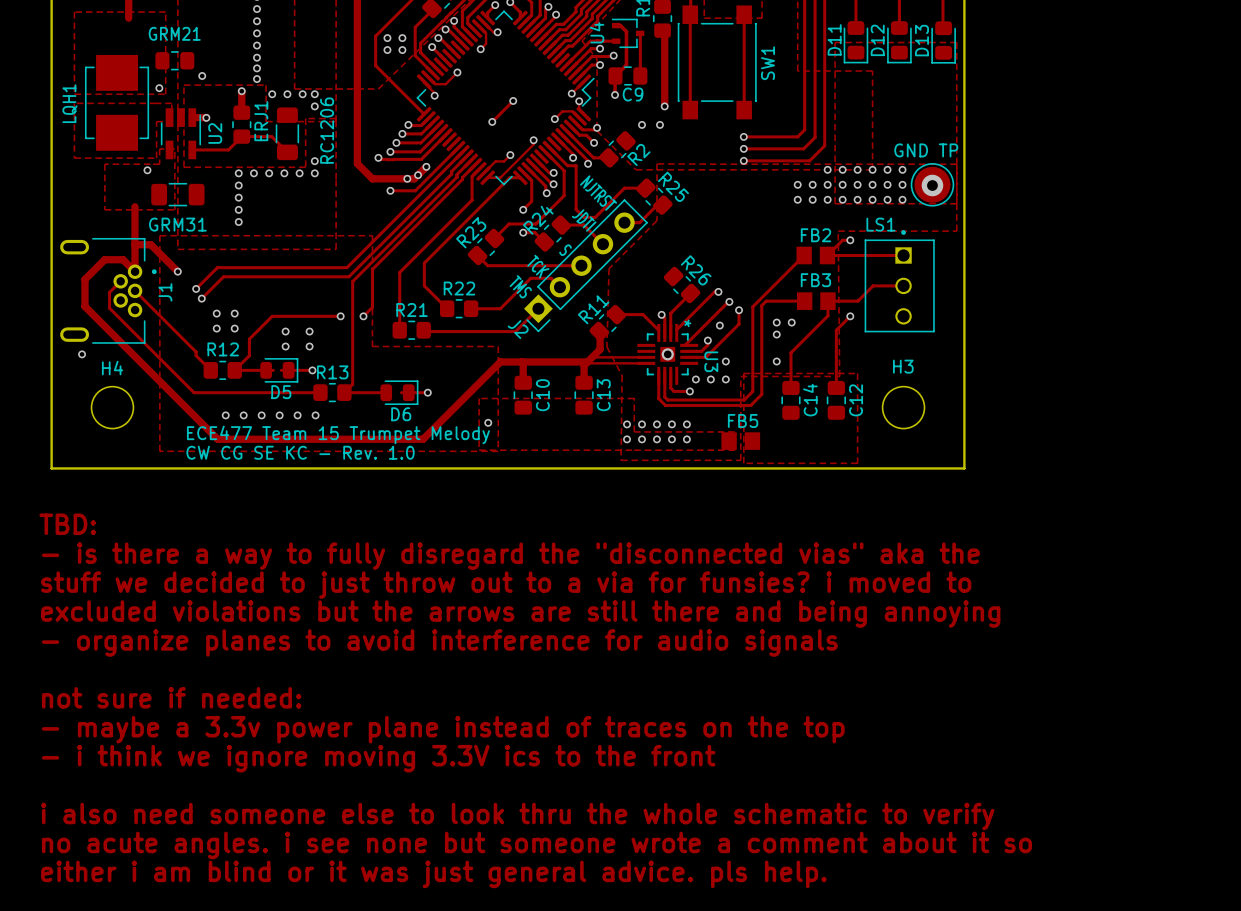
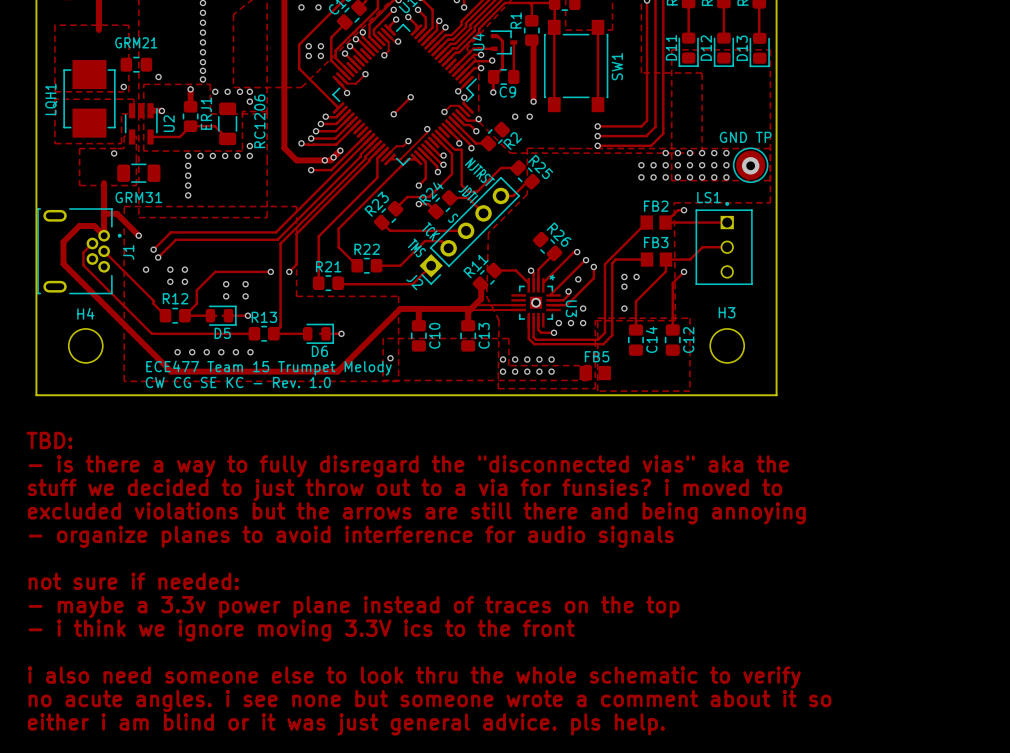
J1 footprint: [60, 238, 157, 344] -> [37, 208, 122, 295]
via: none -> (146, 269)
via: (82, 354) -> none

